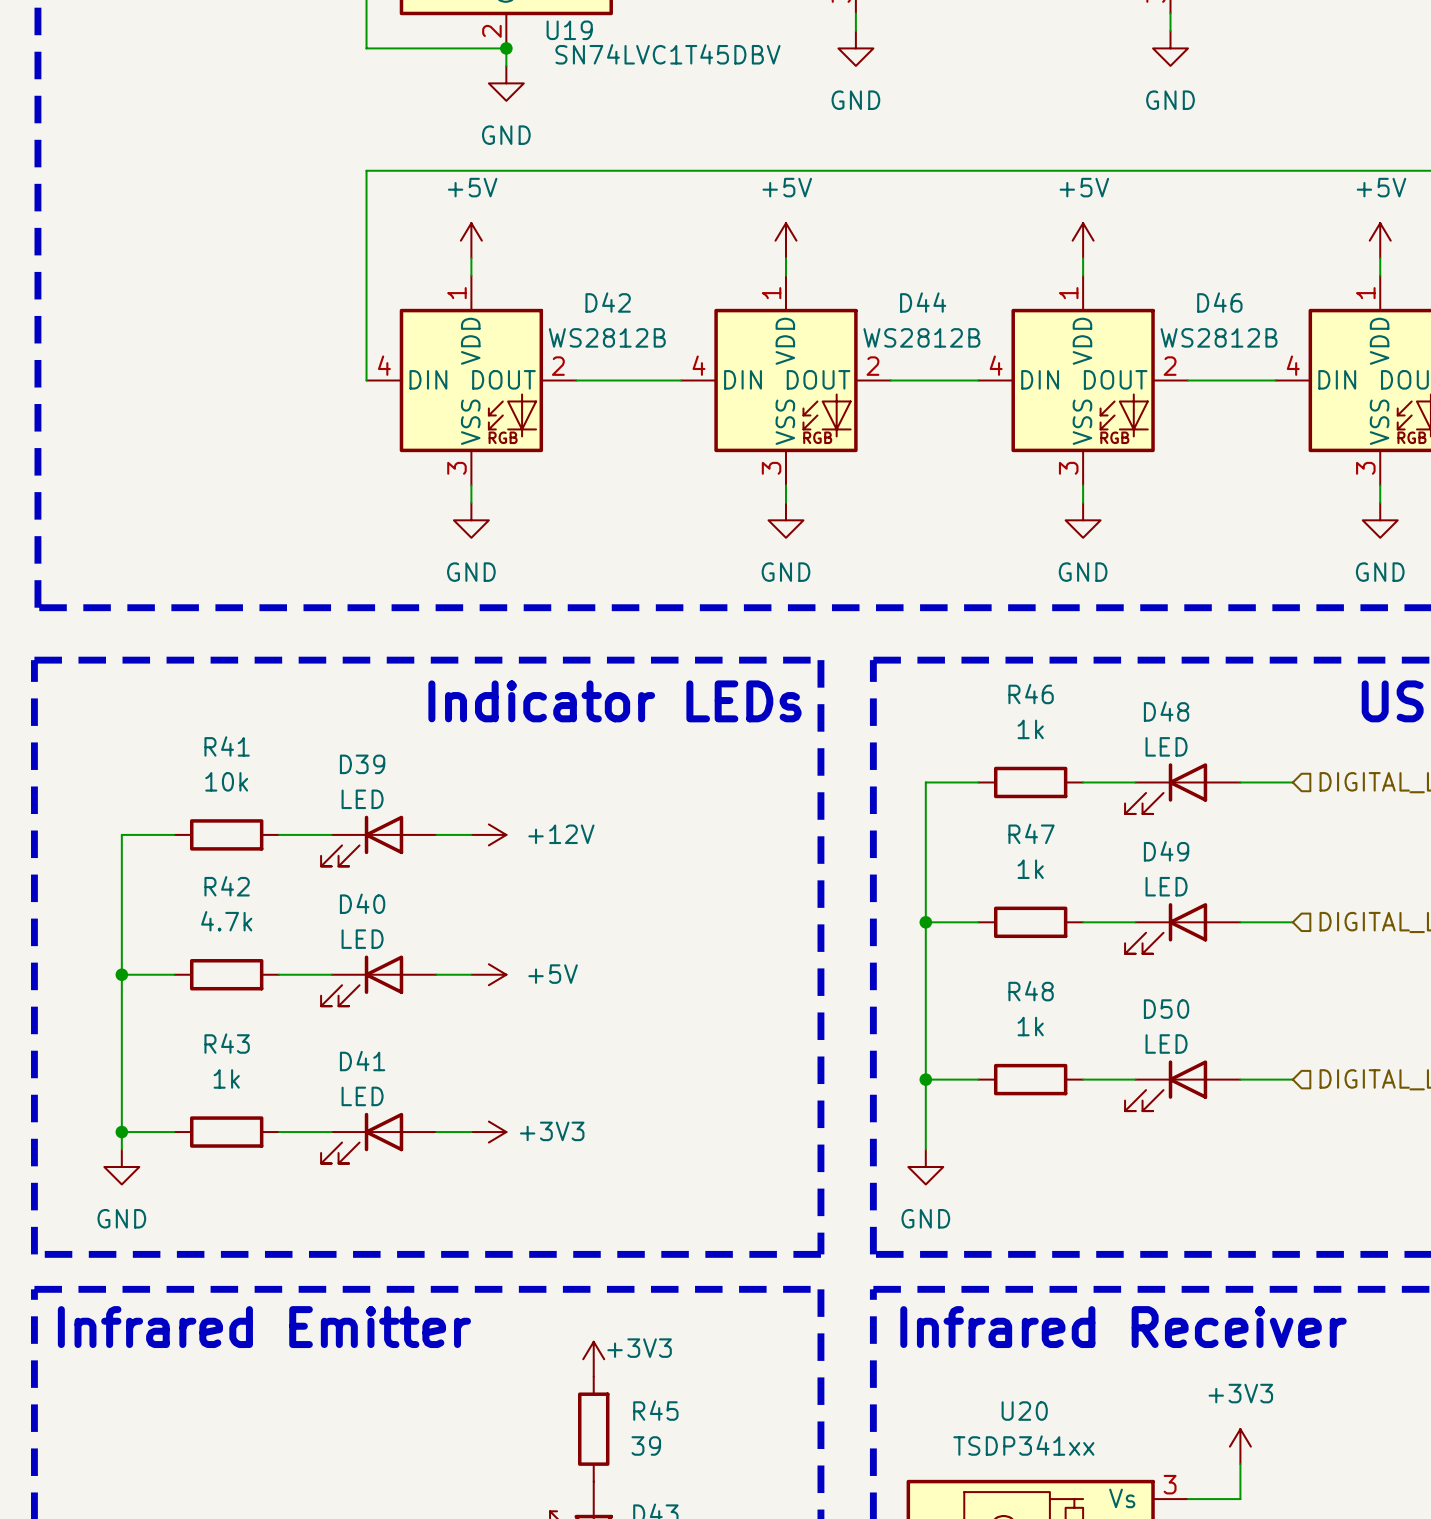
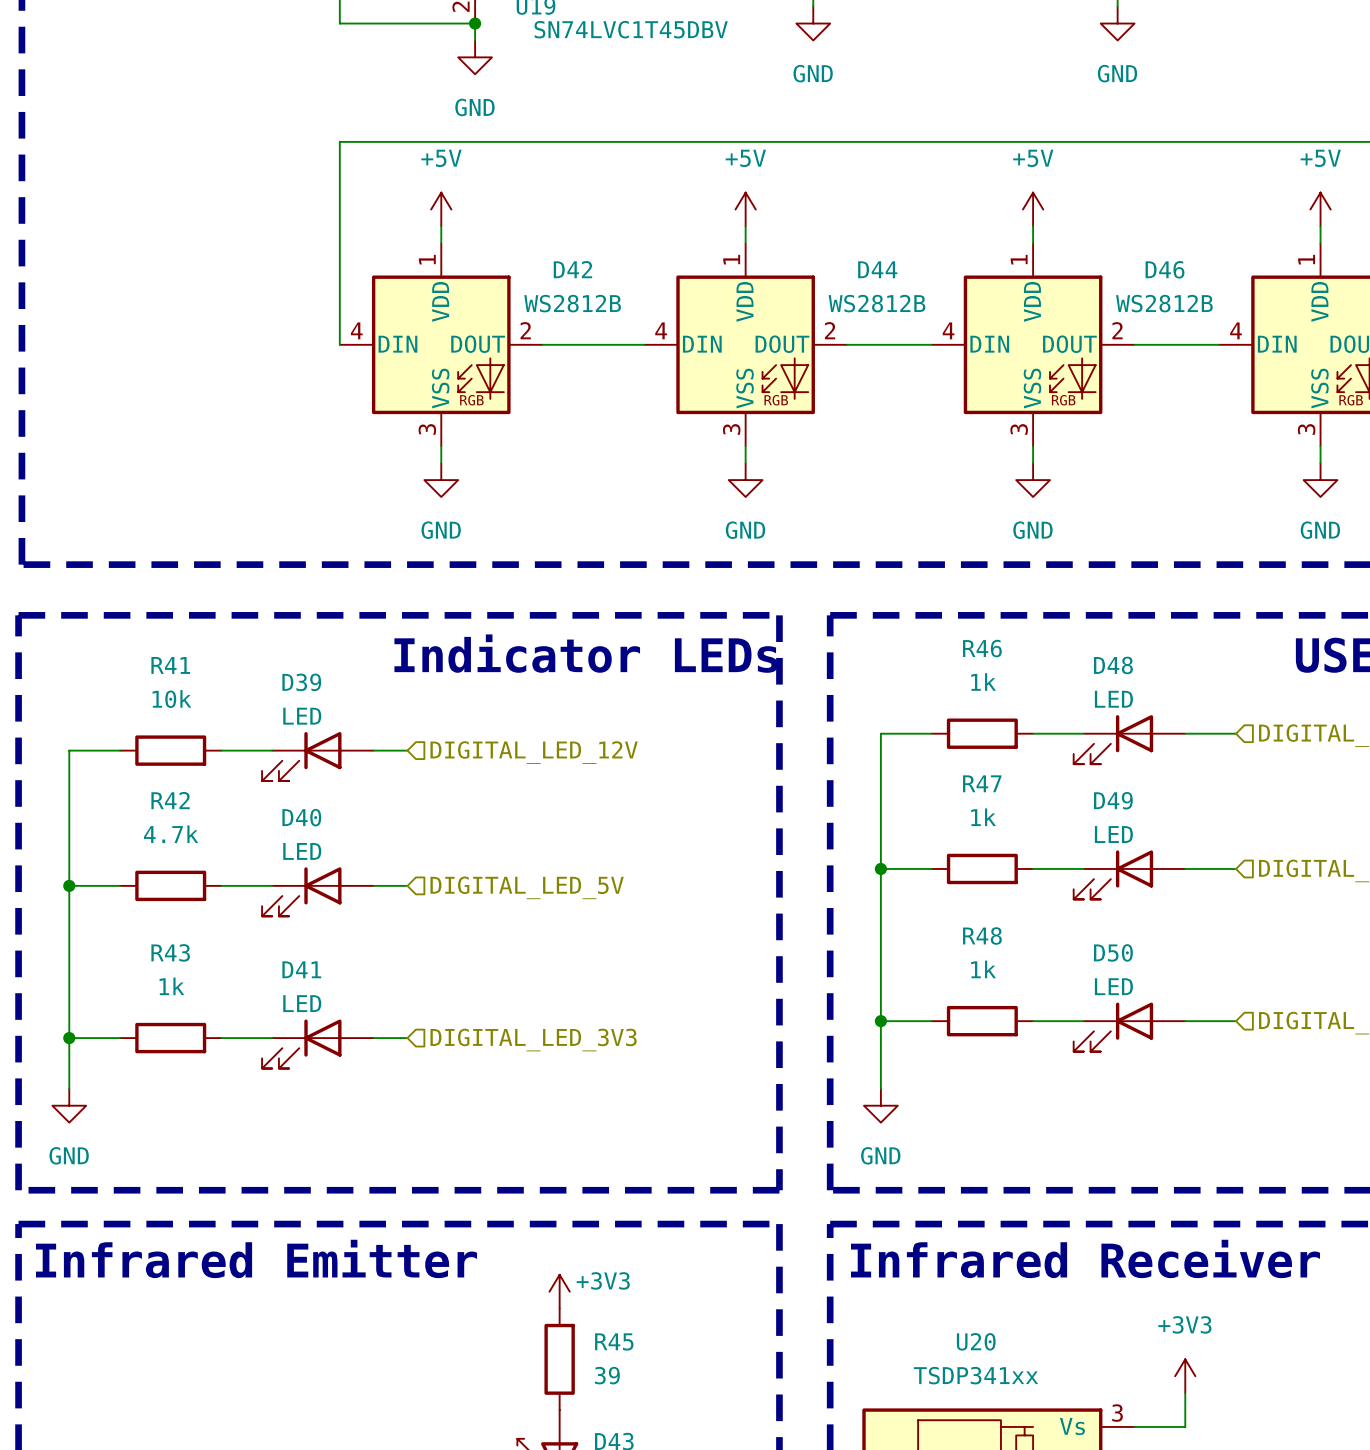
wire: none -> (120, 750) (69, 750) (69, 1088)
hierarchical label: none -> DIGITAL_LED_12V (534, 752)
wire: (174, 834) (121, 834) (121, 1149) -> none
R41 position: (226, 834) -> (170, 750)
wire: (279, 834) (331, 834) -> (221, 750) (272, 750)
wire: (436, 834) (471, 834) -> (373, 750) (407, 750)
power symbol: +12V (488, 834) -> none
D39 position: (378, 841) -> (317, 756)
hierarchical label: none -> DIGITAL_LED_5V (527, 887)
wire: (121, 974) (174, 974) -> (69, 885) (120, 885)
junction position: (121, 974) -> (69, 885)
R42 position: (226, 974) -> (170, 885)
wire: (279, 974) (331, 974) -> (221, 885) (272, 885)
wire: (436, 974) (471, 974) -> (373, 885) (407, 885)
power symbol: +5V (488, 974) -> none
D40 position: (378, 980) -> (317, 891)
hierarchical label: none -> DIGITAL_LED_3V3 (533, 1040)
wire: (121, 1132) (174, 1132) -> (69, 1038) (120, 1038)
junction position: (121, 1132) -> (69, 1038)
R43 position: (226, 1132) -> (170, 1038)
wire: (279, 1132) (331, 1132) -> (221, 1038) (272, 1038)
wire: (436, 1132) (471, 1132) -> (373, 1038) (407, 1038)
power symbol: +3V3 (488, 1132) -> none
D41 position: (378, 1138) -> (317, 1043)
power symbol position: GND (121, 1167) -> GND (69, 1105)

